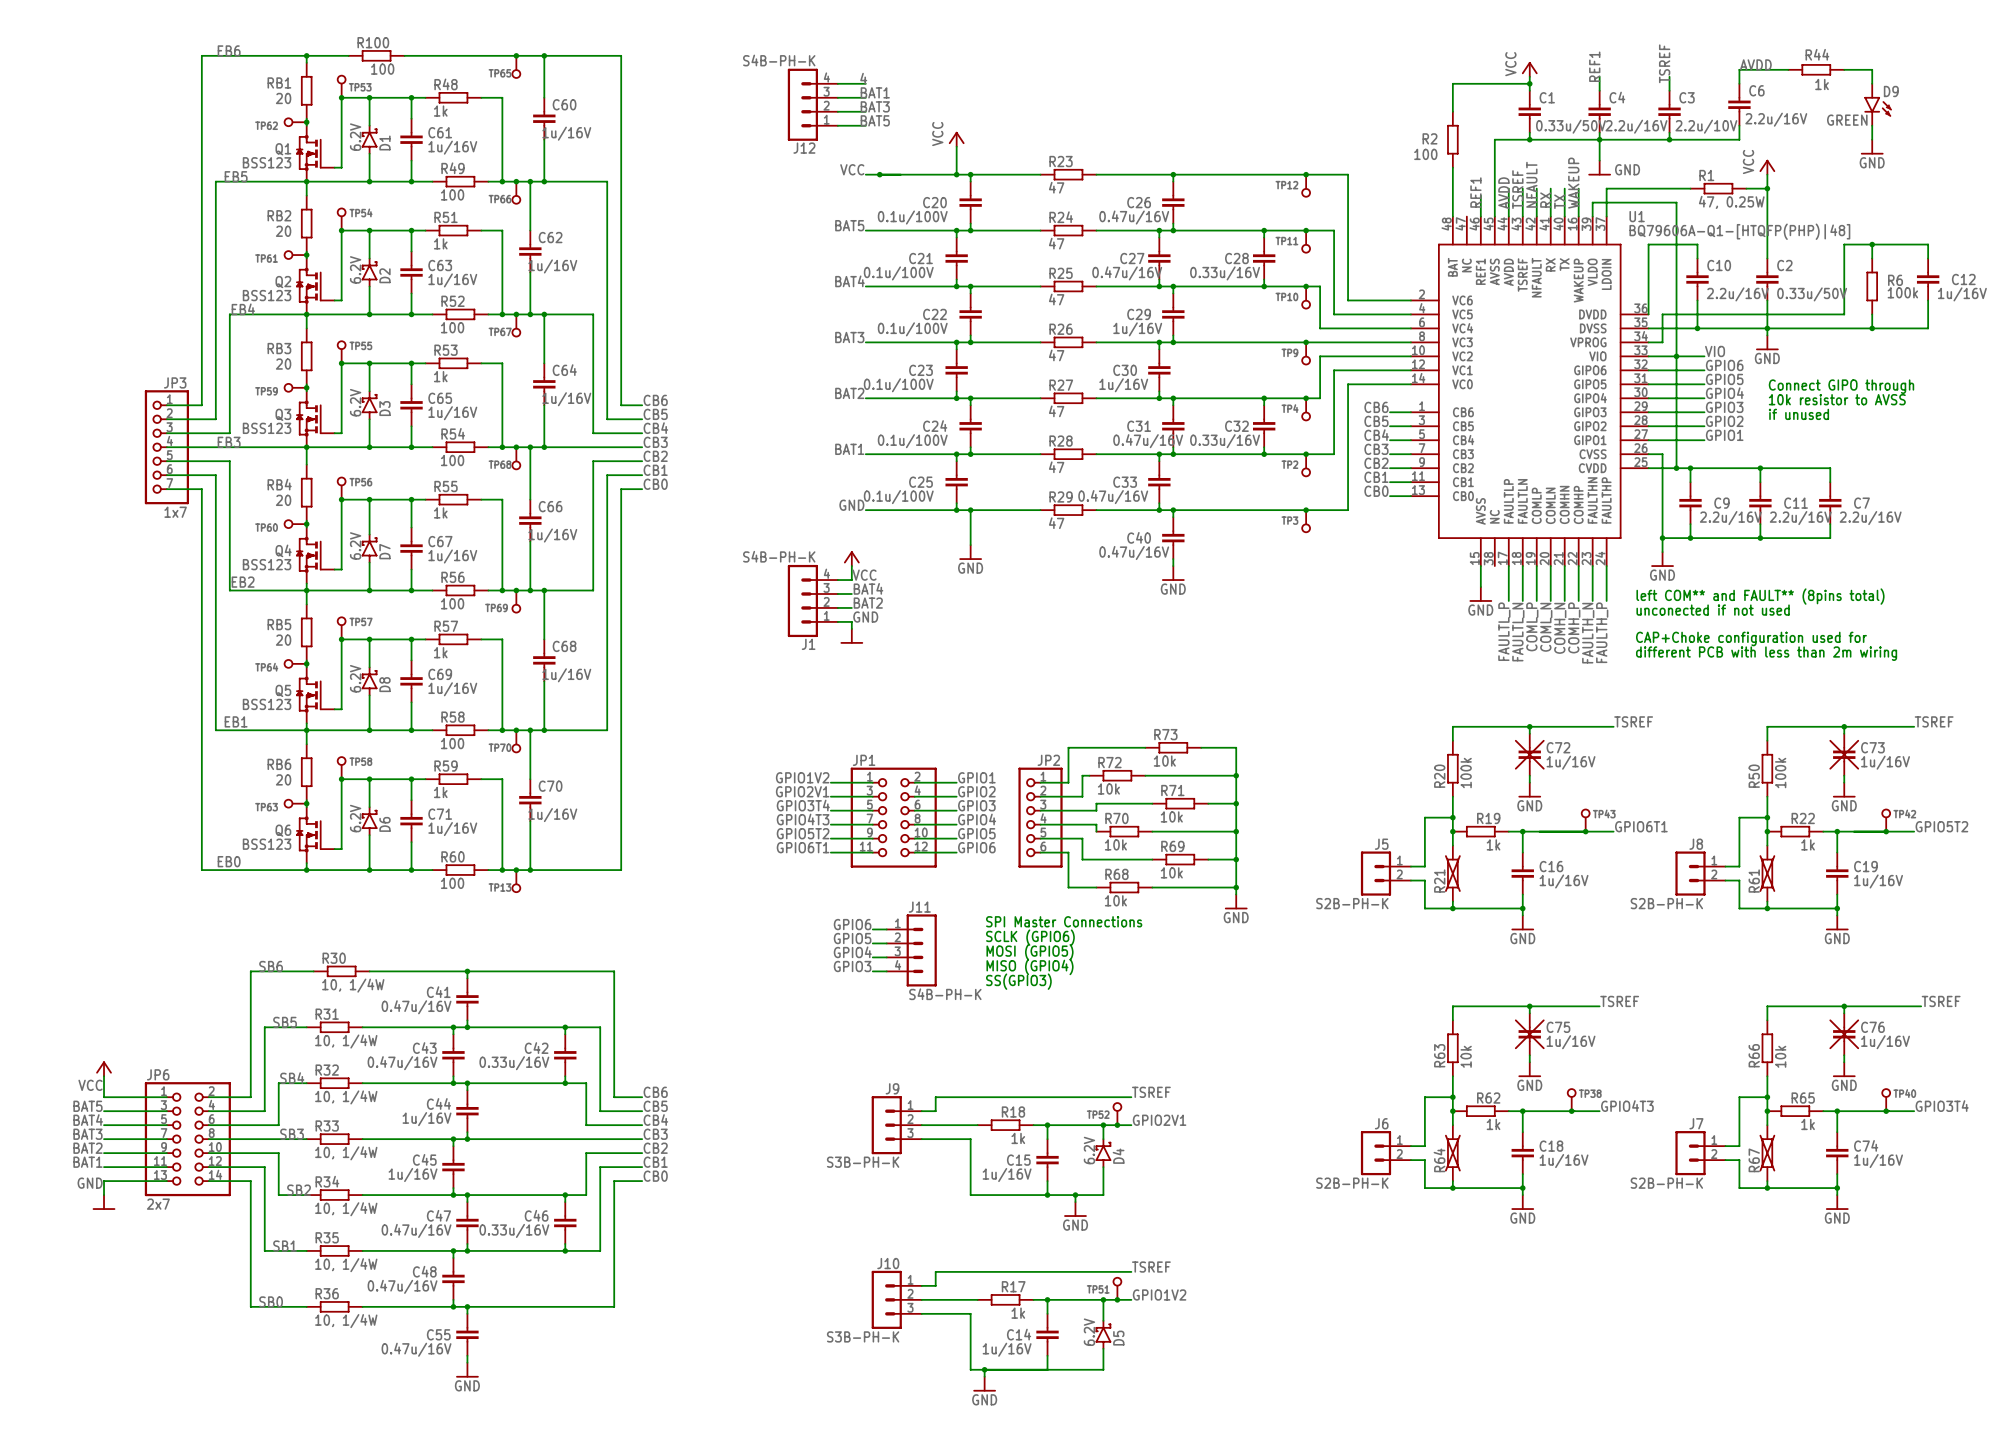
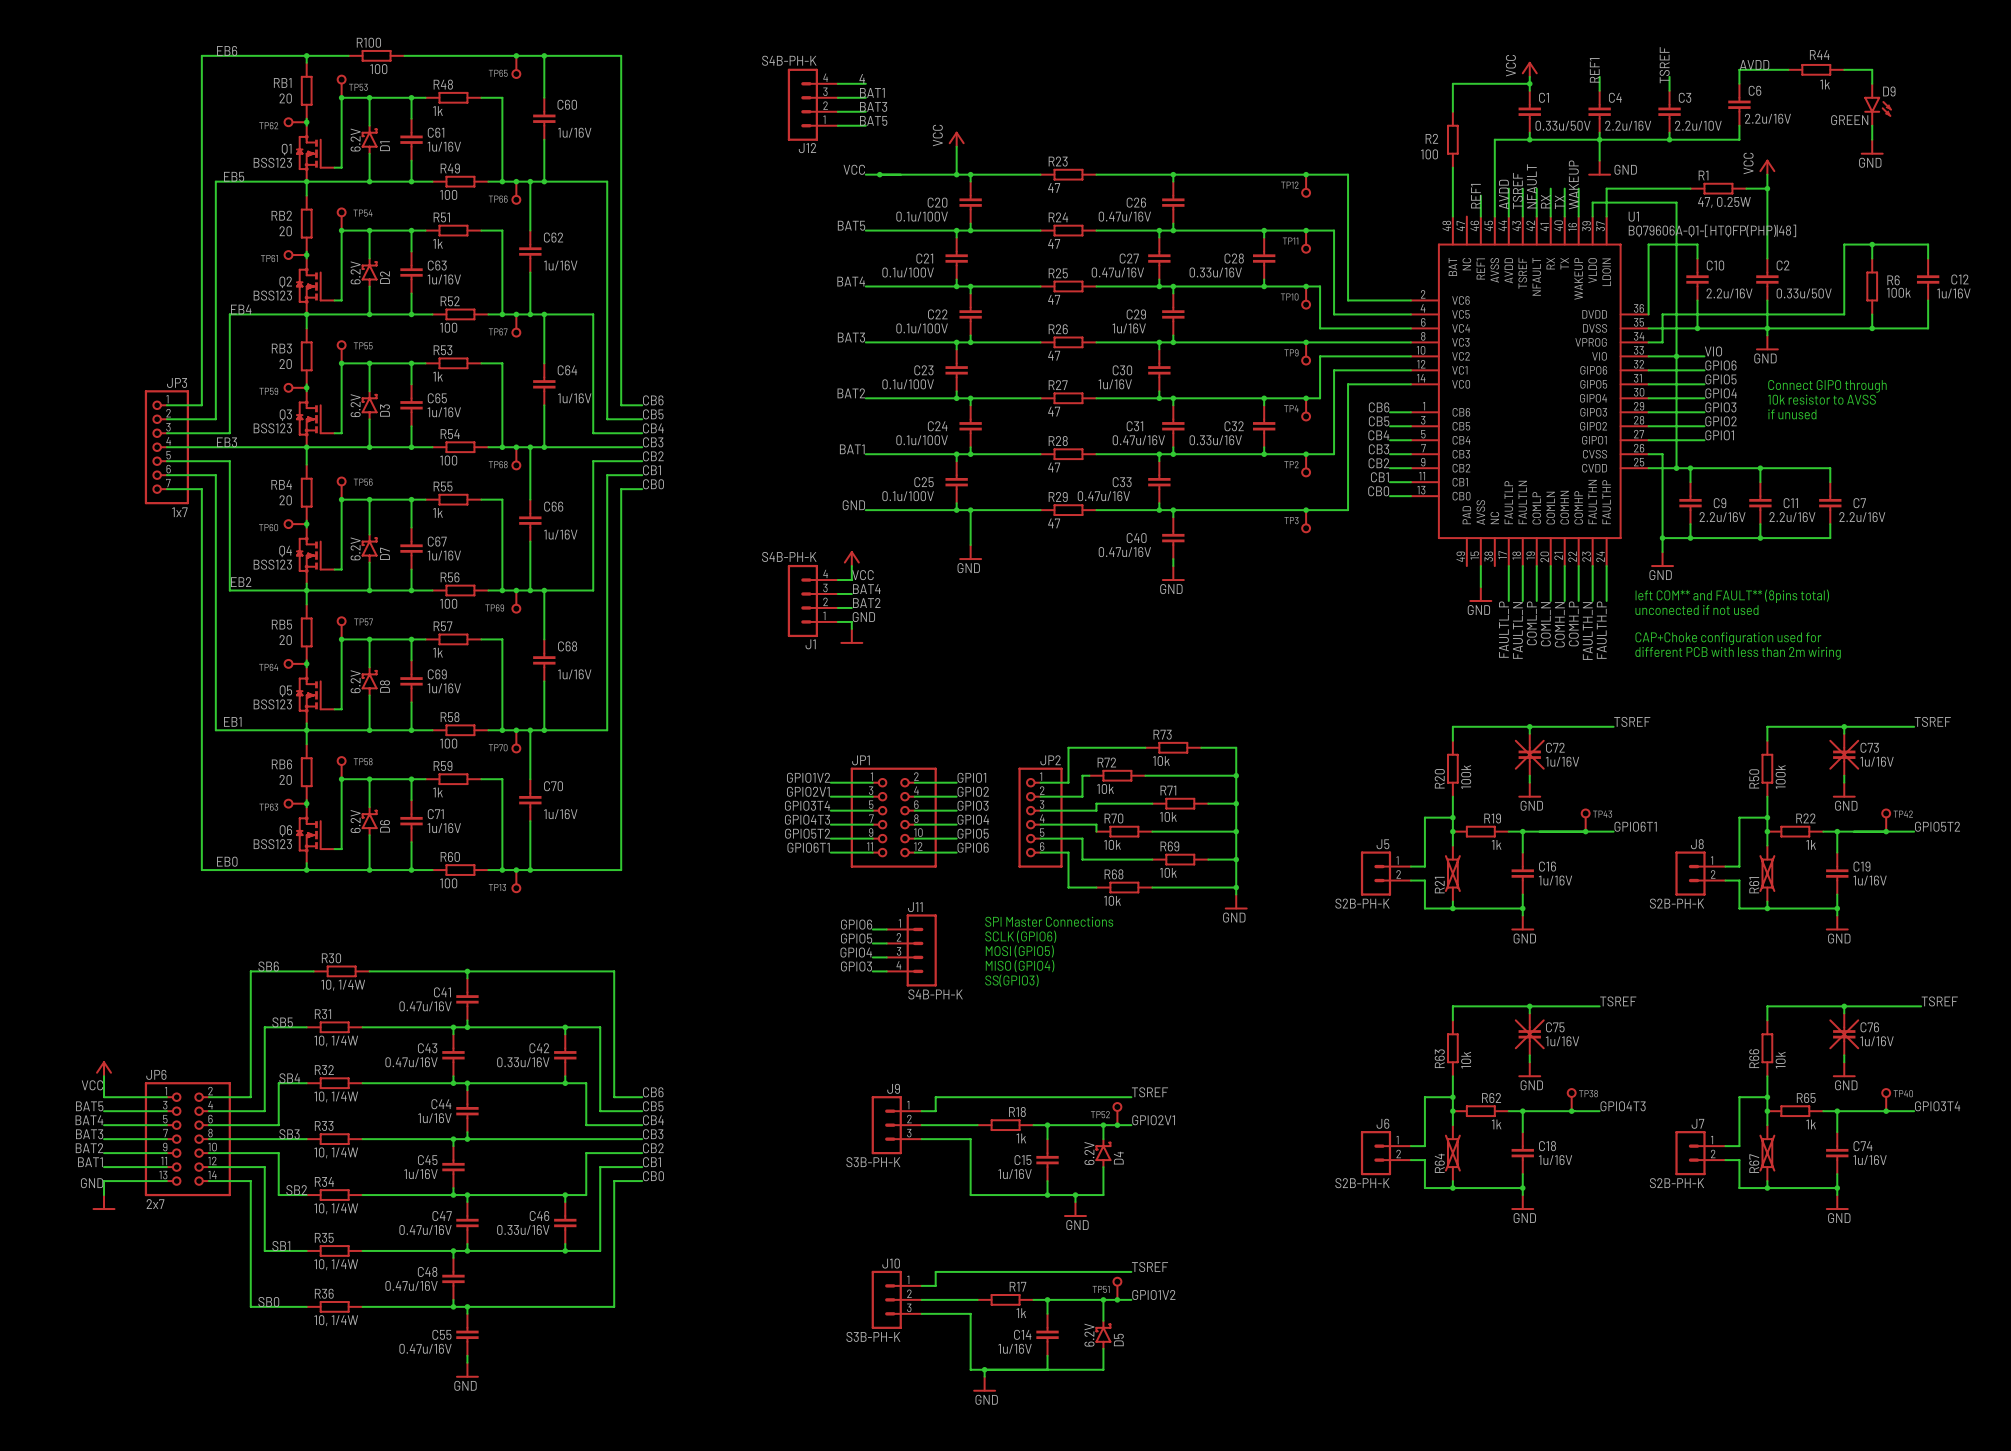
U1 symbol: [1410, 216, 1649, 567] -> [1410, 216, 1649, 567]

